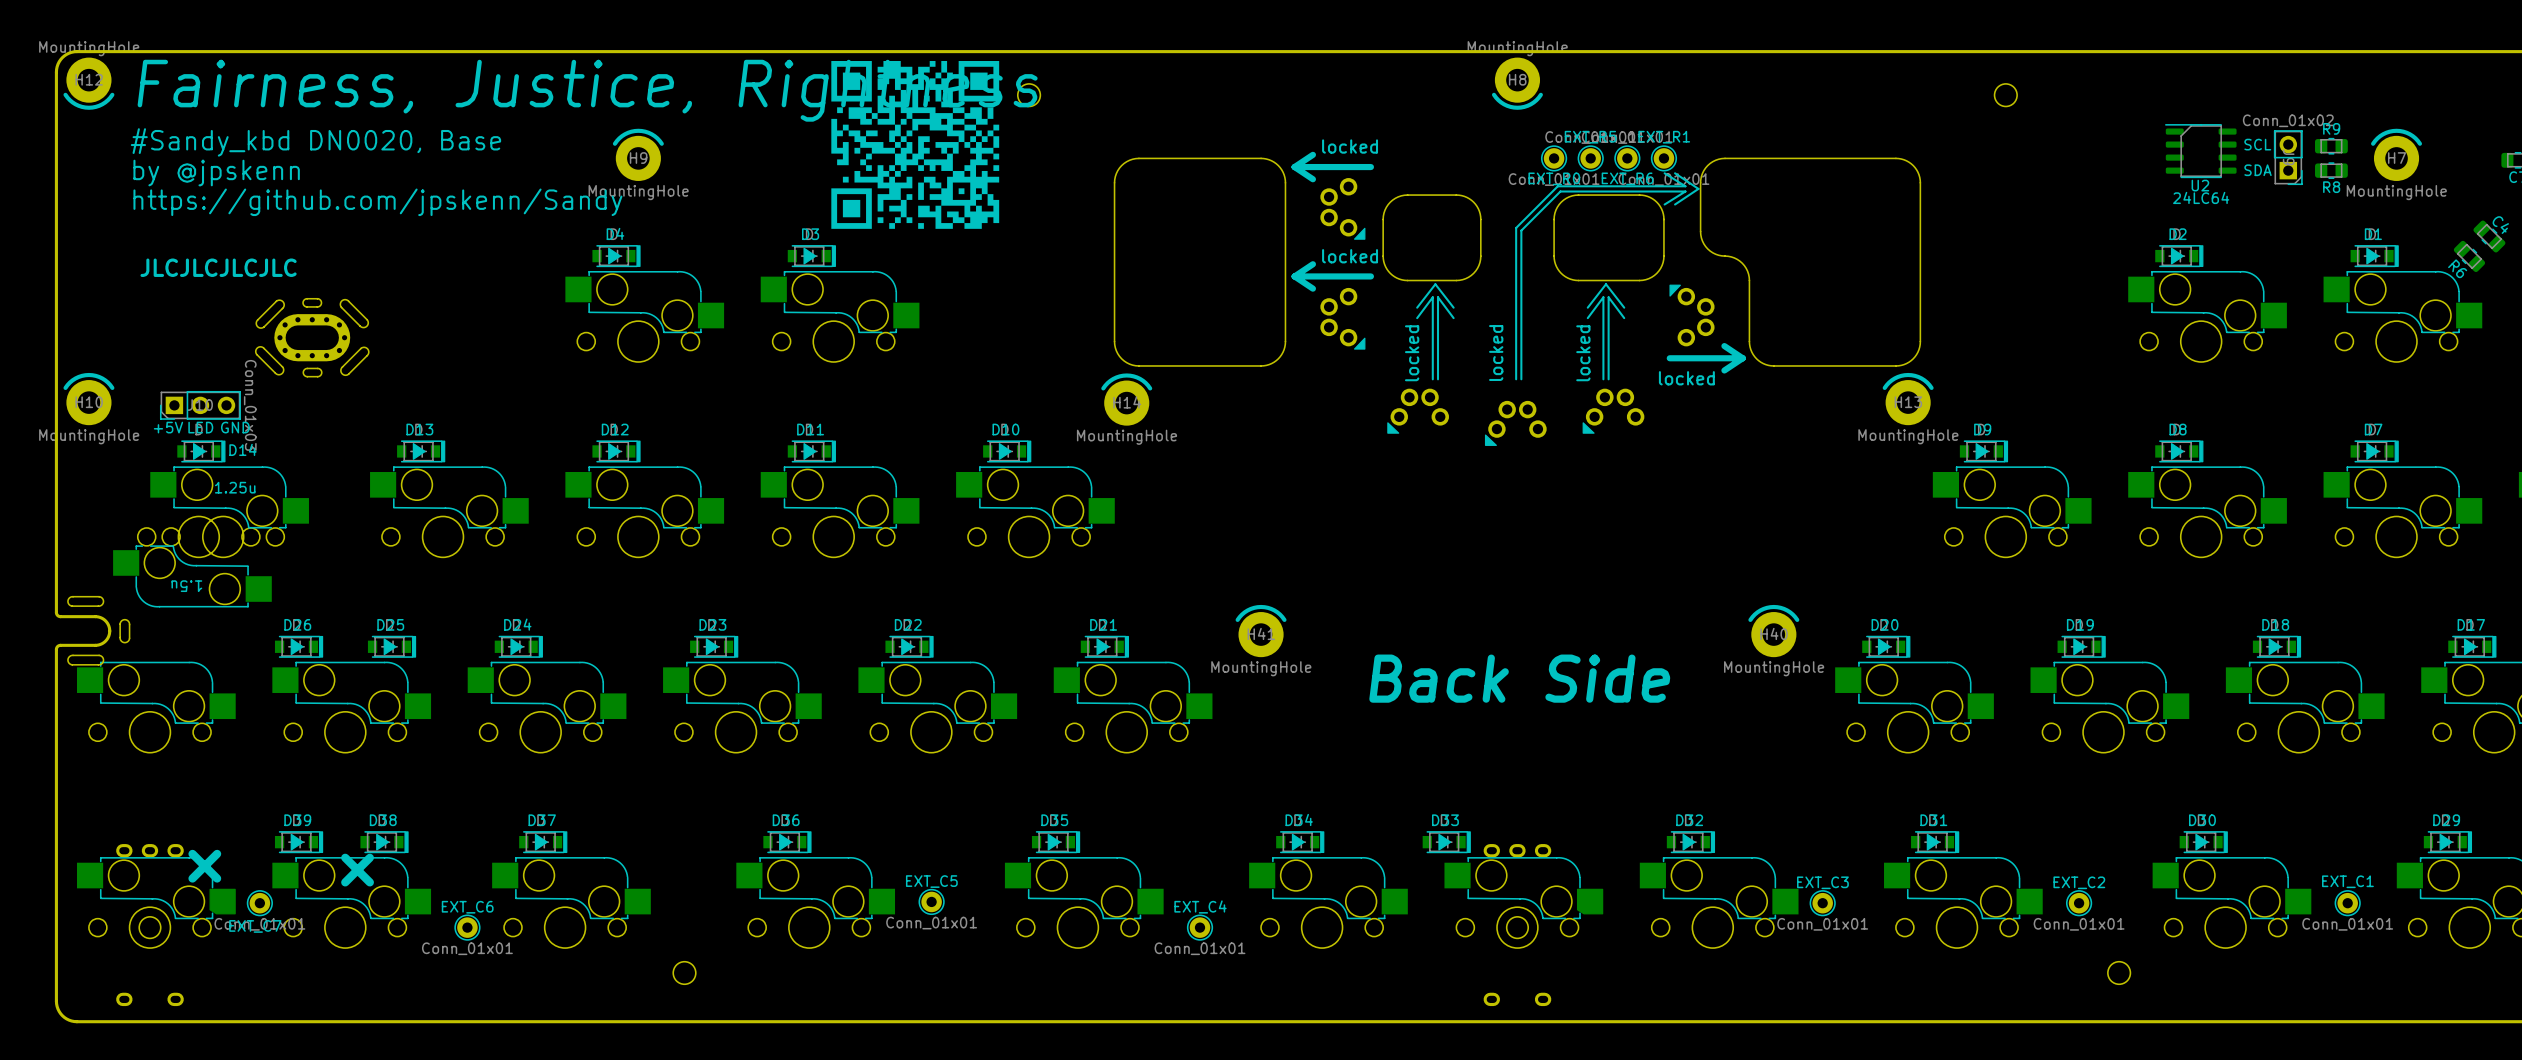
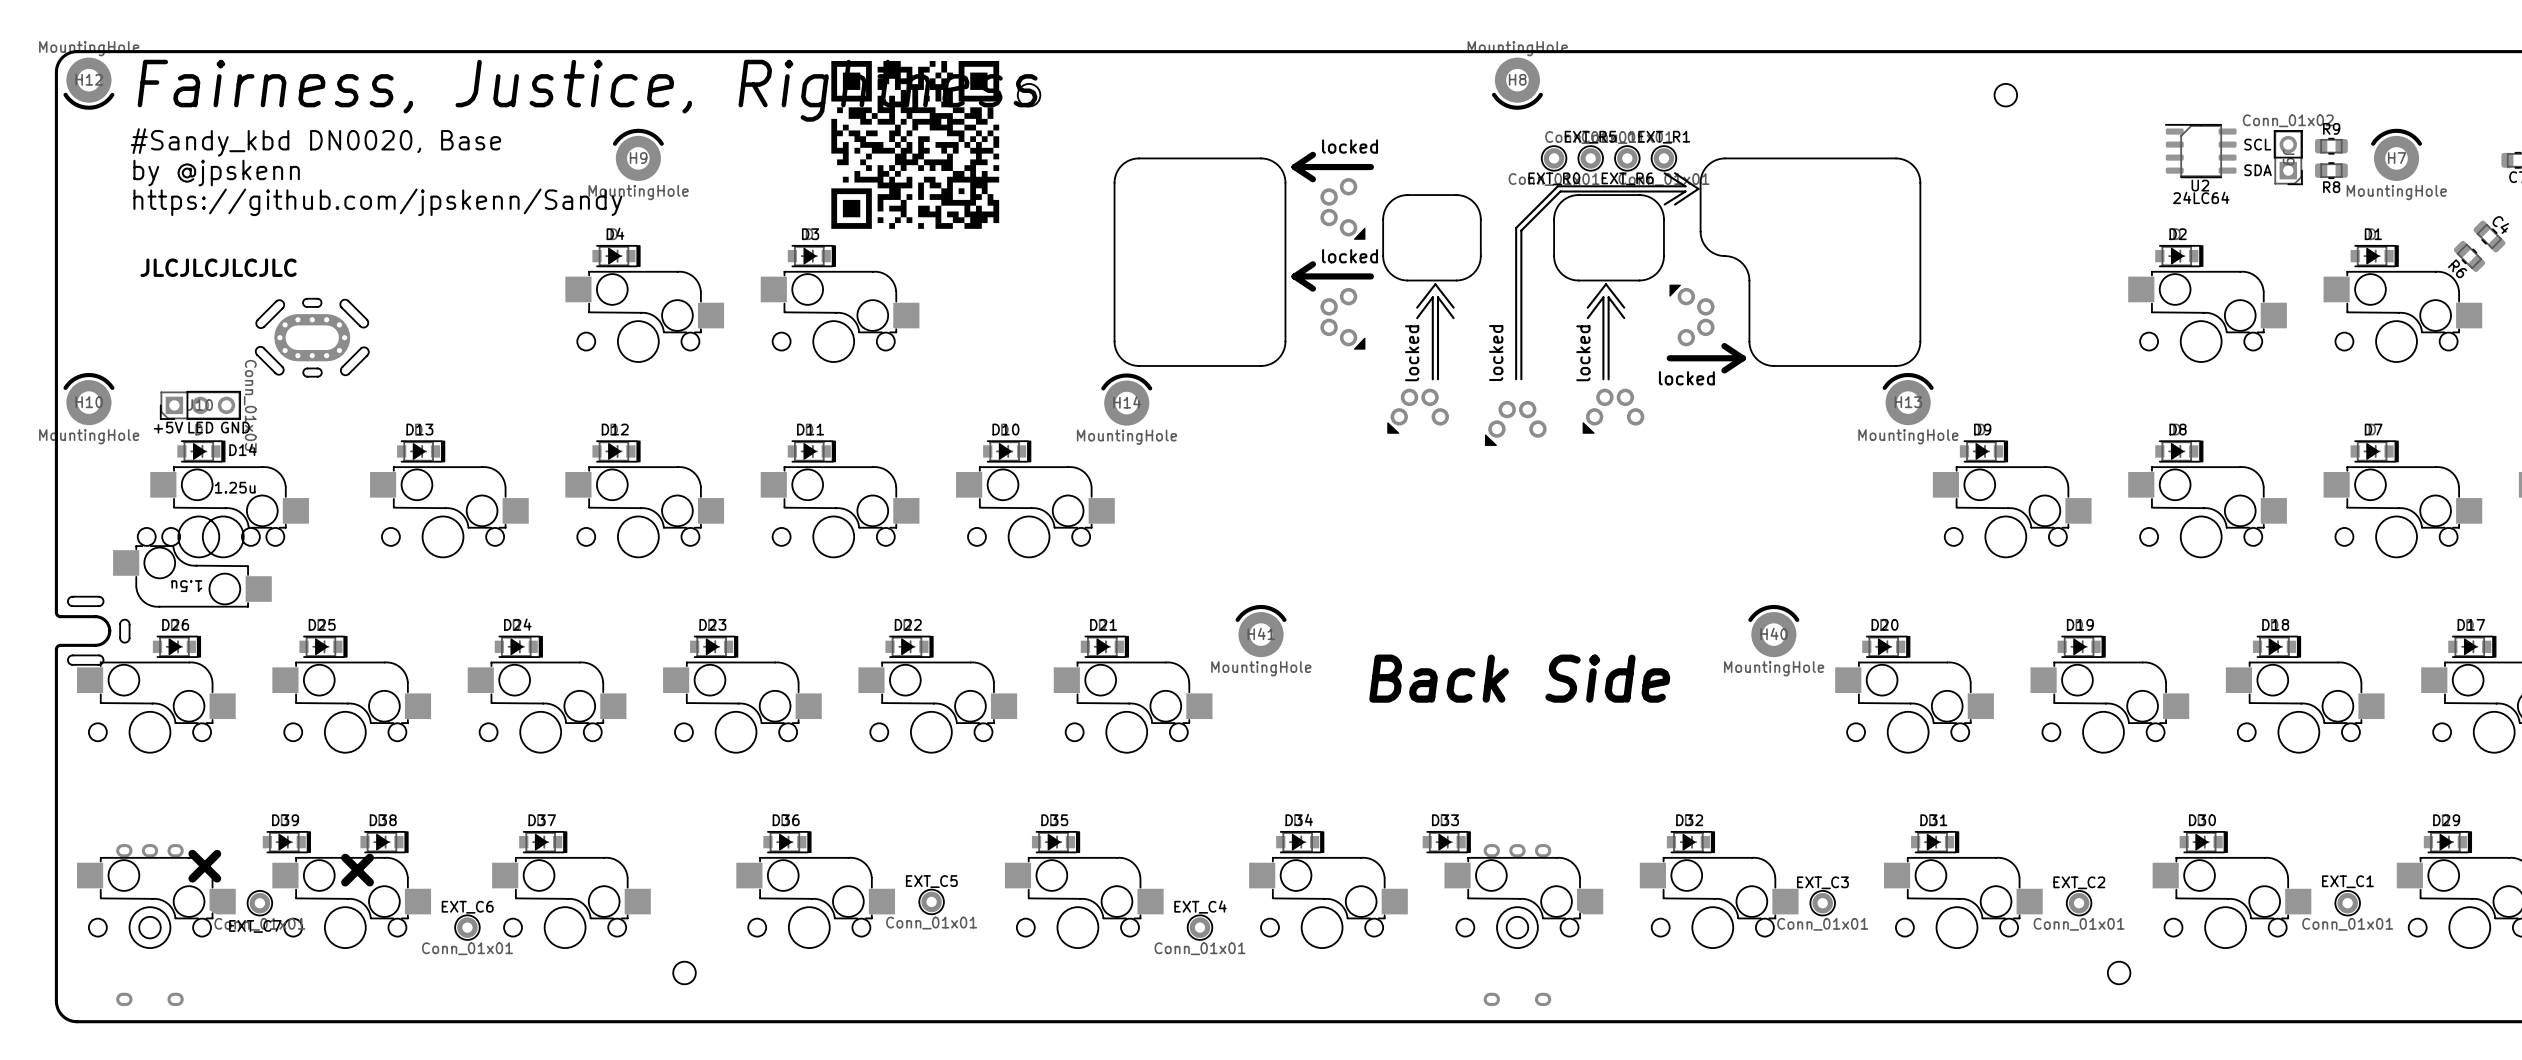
D26 position: (299, 646) -> (176, 646)
D25 position: (392, 646) -> (323, 646)
D39 position: (299, 842) -> (286, 842)

